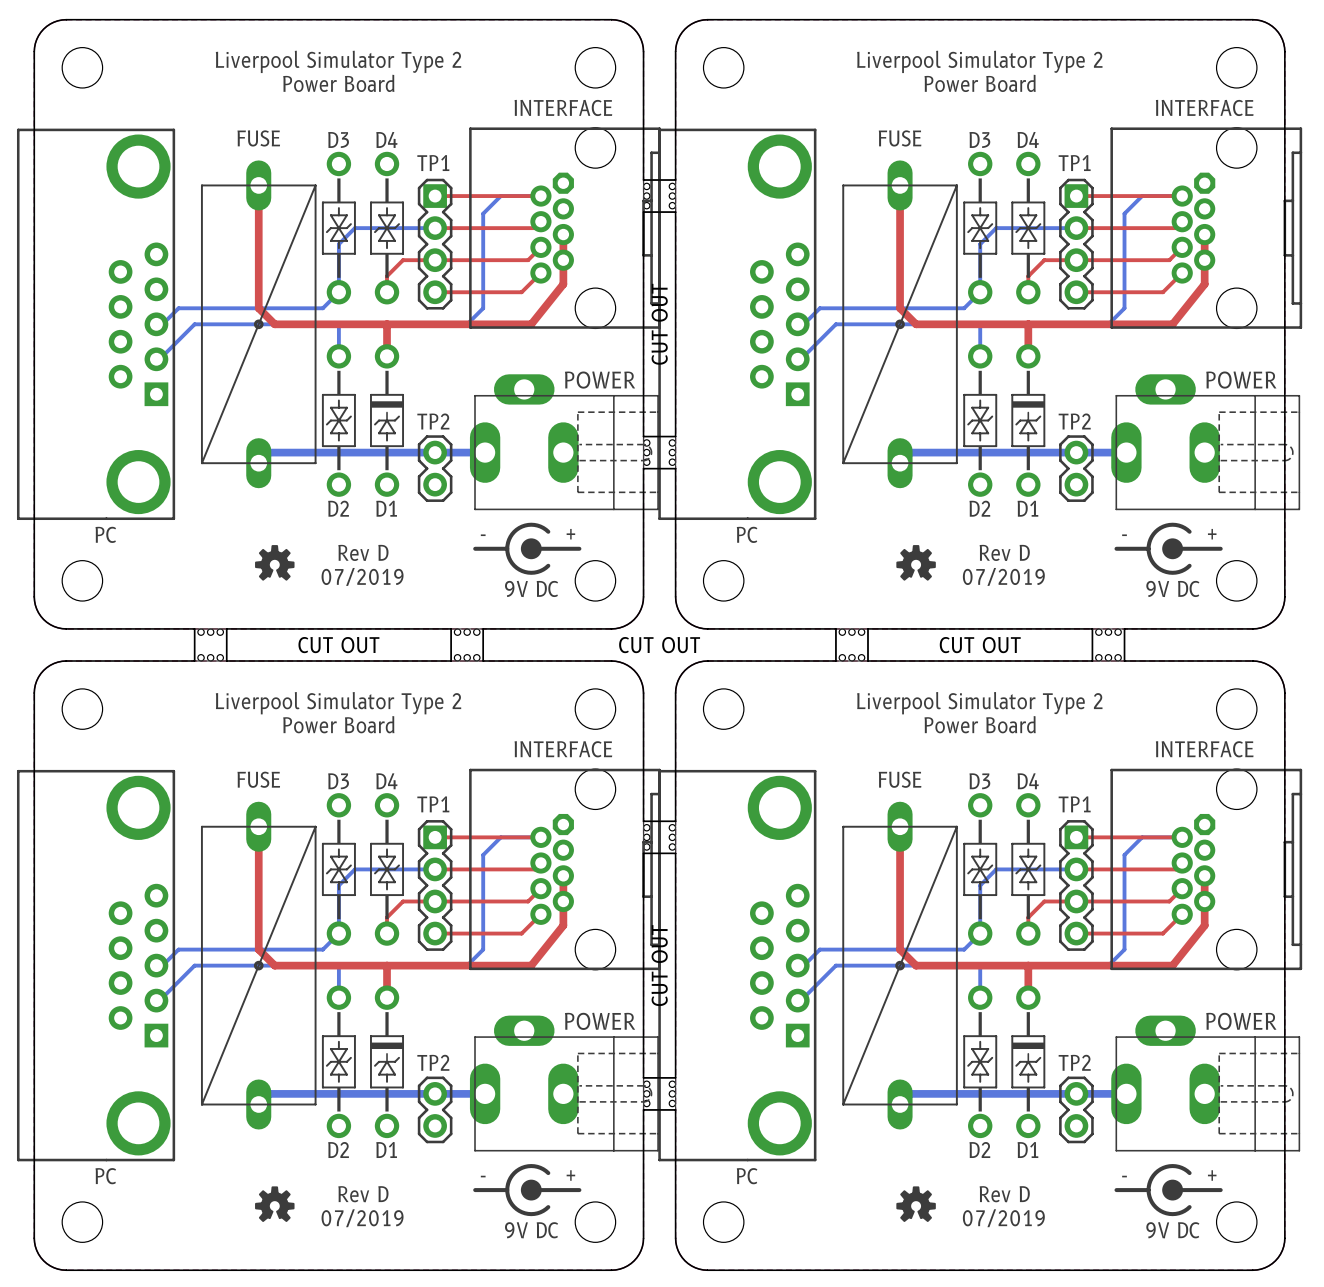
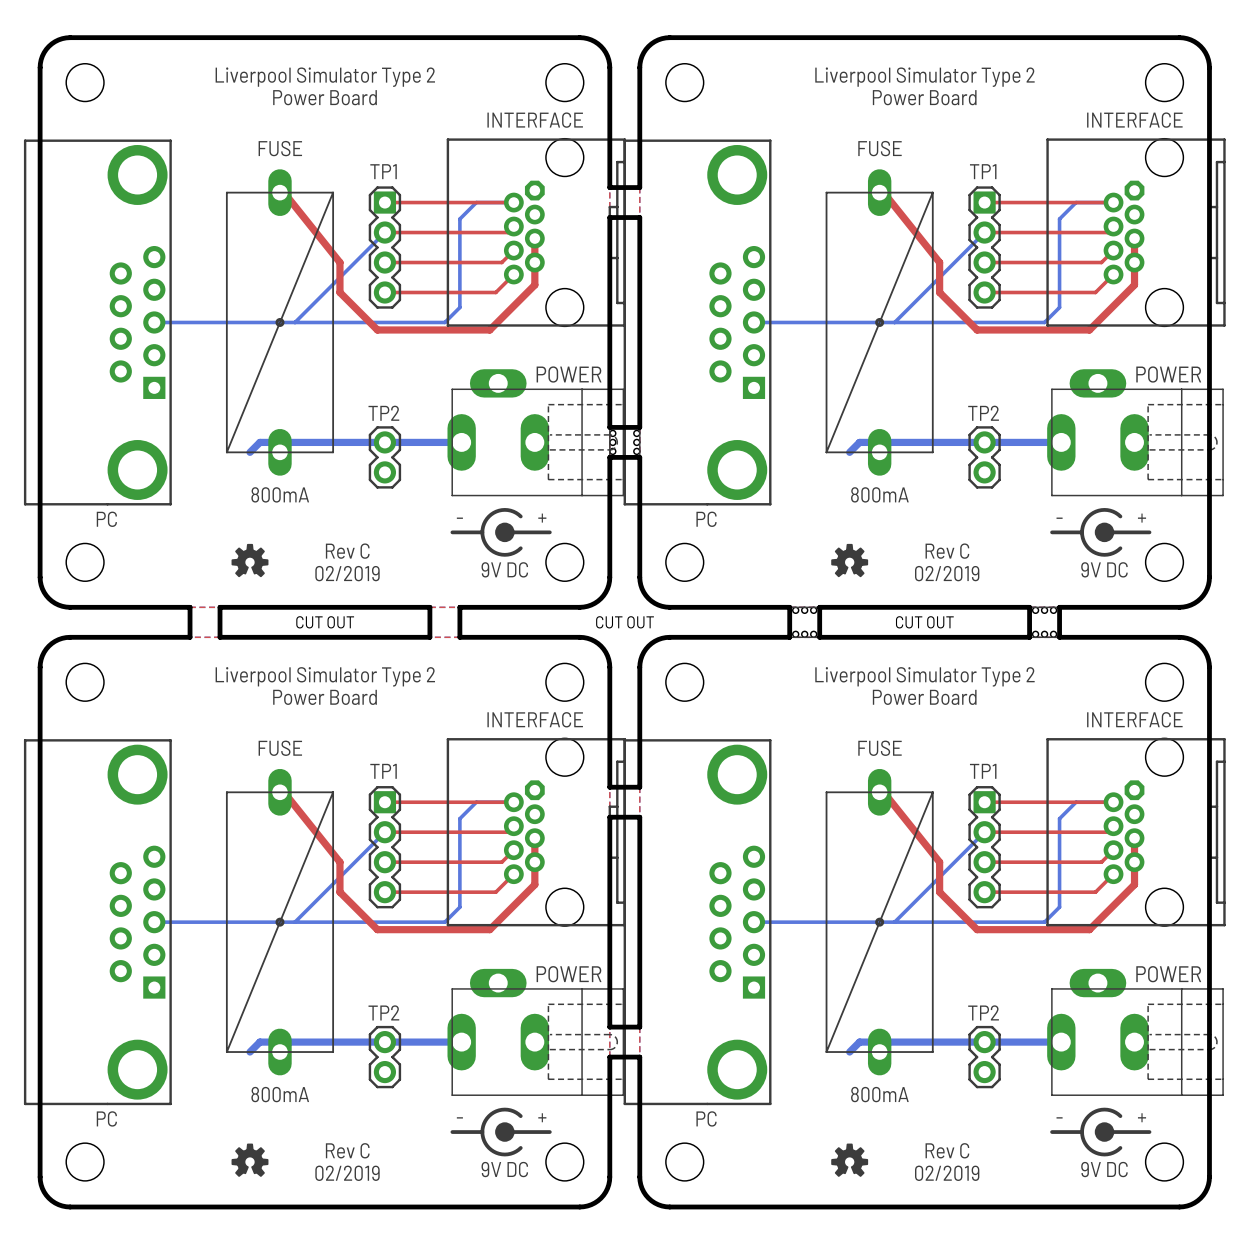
board edge: none -> (70, 37) (587, 38) (601, 46) (607, 56) (609, 63) (609, 187) (639, 187) (640, 63) (642, 56) (648, 46) (662, 38) (1179, 37) (1190, 39) (1200, 46) (1207, 56) (1209, 67) (1208, 585) (1200, 598) (1190, 605) (1183, 607) (1059, 607) (1059, 637) (1183, 637) (1190, 639) (1200, 646) (1208, 659) (1209, 1177) (1207, 1188) (1200, 1198) (1190, 1204) (1179, 1207) (662, 1205) (648, 1198) (642, 1188) (640, 1180) (639, 1057) (609, 1057) (609, 1180) (607, 1188) (601, 1198) (587, 1205) (70, 1207) (58, 1204) (48, 1198) (42, 1188) (40, 1177) (41, 659) (48, 646) (58, 639) (66, 637) (190, 637) (190, 607) (66, 607) (58, 605) (48, 598) (41, 585) (40, 67) (42, 56) (48, 46) (58, 39) (70, 37)
top track: (258, 185) (258, 308) (274, 324) (531, 324) (563, 284) -> (279, 192) (279, 187) (339, 262) (339, 292) (377, 329) (489, 329) (534, 285)
top track: (900, 185) (900, 308) (916, 324) (1172, 324) (1204, 284) -> (879, 192) (879, 187) (939, 262) (939, 292) (977, 329) (1089, 329) (1134, 285)
top track: none -> (384, 202) (414, 202)
top track: none -> (984, 202) (1014, 202)
board edge: none -> (609, 217) (609, 427) (639, 427) (639, 217) (609, 217)
part: (338, 228) -> none
part: (387, 228) -> none
top track: none -> (384, 232) (414, 232)
bottom track: (435, 228) (354, 228) (338, 244) (338, 292) -> (384, 232) (324, 292)
part: (980, 228) -> none
part: (1028, 228) -> none
top track: none -> (984, 232) (1014, 232)
bottom track: (1076, 228) (996, 228) (980, 244) (980, 292) -> (984, 232) (924, 292)
part position: (435, 244) -> (384, 247)
part position: (1076, 244) -> (984, 247)
top track: (403, 260) (387, 276) (387, 292) -> none
top track: (1044, 260) (1028, 276) (1028, 292) -> none
top track: none -> (384, 292) (414, 292)
top track: none -> (984, 292) (1014, 292)
bottom track: (322, 308) (178, 308) (162, 324) -> (309, 307) (294, 322)
bottom track: (964, 308) (819, 308) (803, 324) -> (909, 307) (894, 322)
bottom track: (194, 324) (159, 359) -> (190, 322) (160, 322)
part: (258, 324) -> none
part: none -> 800mA (279, 322)
bottom track: (338, 324) (338, 356) -> none
top track: (387, 324) (387, 356) -> none
bottom track: (835, 324) (800, 359) -> (789, 322) (759, 322)
part: (900, 324) -> none
part: none -> 800mA (879, 322)
bottom track: (980, 324) (980, 356) -> none
top track: (1028, 324) (1028, 356) -> none
part: (338, 420) -> none
part: (387, 420) -> none
part: (980, 420) -> none
part: (1028, 420) -> none
part: none -> (624, 442)
part position: (435, 468) -> (384, 457)
board edge: none -> (609, 457) (609, 577) (608, 585) (603, 595) (594, 603) (583, 607) (459, 607) (459, 637) (579, 637) (587, 638) (598, 643) (605, 652) (609, 663) (609, 787) (639, 787) (639, 667) (640, 659) (645, 649) (654, 641) (665, 637) (789, 637) (789, 607) (669, 607) (662, 606) (651, 601) (643, 592) (640, 581) (639, 457) (609, 457)
part position: (1076, 468) -> (984, 457)
text: Rev D (363, 552) -> Rev C (347, 551)
text: Rev D (1004, 552) -> Rev C (947, 551)
drawing position: (274, 562) -> (250, 560)
drawing position: (916, 562) -> (849, 560)
text: 07/2019 (362, 576) -> 02/2019 (347, 573)
text: 07/2019 (1003, 576) -> 02/2019 (947, 573)
board edge: none -> (220, 607) (429, 607) (429, 637) (220, 637) (220, 607)
board edge: none -> (819, 607) (1029, 607) (1029, 637) (819, 637) (819, 607)
part: (659, 644) -> none
part: none -> (804, 622)
part: none -> (1044, 622)
text: none -> CUT OUT (325, 622)
text: none -> CUT OUT (625, 622)
text: none -> CUT OUT (924, 622)
top track: (258, 826) (258, 949) (274, 965) (531, 965) (563, 925) -> (279, 792) (279, 787) (339, 862) (339, 892) (377, 929) (489, 929) (534, 884)
top track: (900, 826) (900, 949) (916, 965) (1172, 965) (1204, 925) -> (879, 792) (879, 787) (939, 862) (939, 892) (977, 929) (1089, 929) (1134, 884)
top track: none -> (384, 802) (414, 802)
top track: none -> (984, 802) (1014, 802)
board edge: none -> (609, 817) (609, 1027) (639, 1027) (639, 817) (609, 817)
D3: (338, 869) -> none
D4: (387, 869) -> none
top track: none -> (384, 832) (414, 832)
bottom track: (435, 869) (354, 869) (338, 885) (338, 933) -> (384, 832) (324, 892)
part: (980, 869) -> none
part: (1028, 869) -> none
top track: none -> (984, 832) (1014, 832)
bottom track: (1076, 869) (996, 869) (980, 885) (980, 933) -> (984, 832) (924, 892)
TP1 position: (435, 885) -> (384, 847)
part position: (1076, 885) -> (984, 847)
top track: (403, 901) (387, 917) (387, 933) -> none
top track: (1044, 901) (1028, 917) (1028, 933) -> none
top track: none -> (384, 892) (414, 892)
top track: none -> (984, 892) (1014, 892)
bottom track: (322, 949) (178, 949) (162, 965) -> (309, 907) (294, 922)
bottom track: (964, 949) (819, 949) (803, 965) -> (909, 907) (894, 922)
bottom track: (194, 965) (159, 1000) -> (190, 922) (160, 922)
FUSE: (258, 965) -> none
FUSE: none -> 800mA (279, 922)
bottom track: (338, 965) (338, 997) -> none
top track: (387, 965) (387, 997) -> none
bottom track: (835, 965) (800, 1000) -> (789, 922) (759, 922)
part: (900, 965) -> none
part: none -> 800mA (879, 922)
bottom track: (980, 965) (980, 997) -> none
top track: (1028, 965) (1028, 997) -> none
D2: (338, 1061) -> none
D1: (387, 1061) -> none
part: (980, 1061) -> none
part: (1028, 1061) -> none
TP2 position: (435, 1109) -> (384, 1057)
part position: (1076, 1109) -> (984, 1057)
text: Rev D (363, 1194) -> Rev C (347, 1150)
text: Rev D (1004, 1194) -> Rev C (947, 1150)
drawing position: (274, 1204) -> (250, 1160)
drawing position: (916, 1204) -> (849, 1160)
text: 07/2019 (362, 1218) -> 02/2019 (347, 1173)
text: 07/2019 (1003, 1218) -> 02/2019 (947, 1173)

